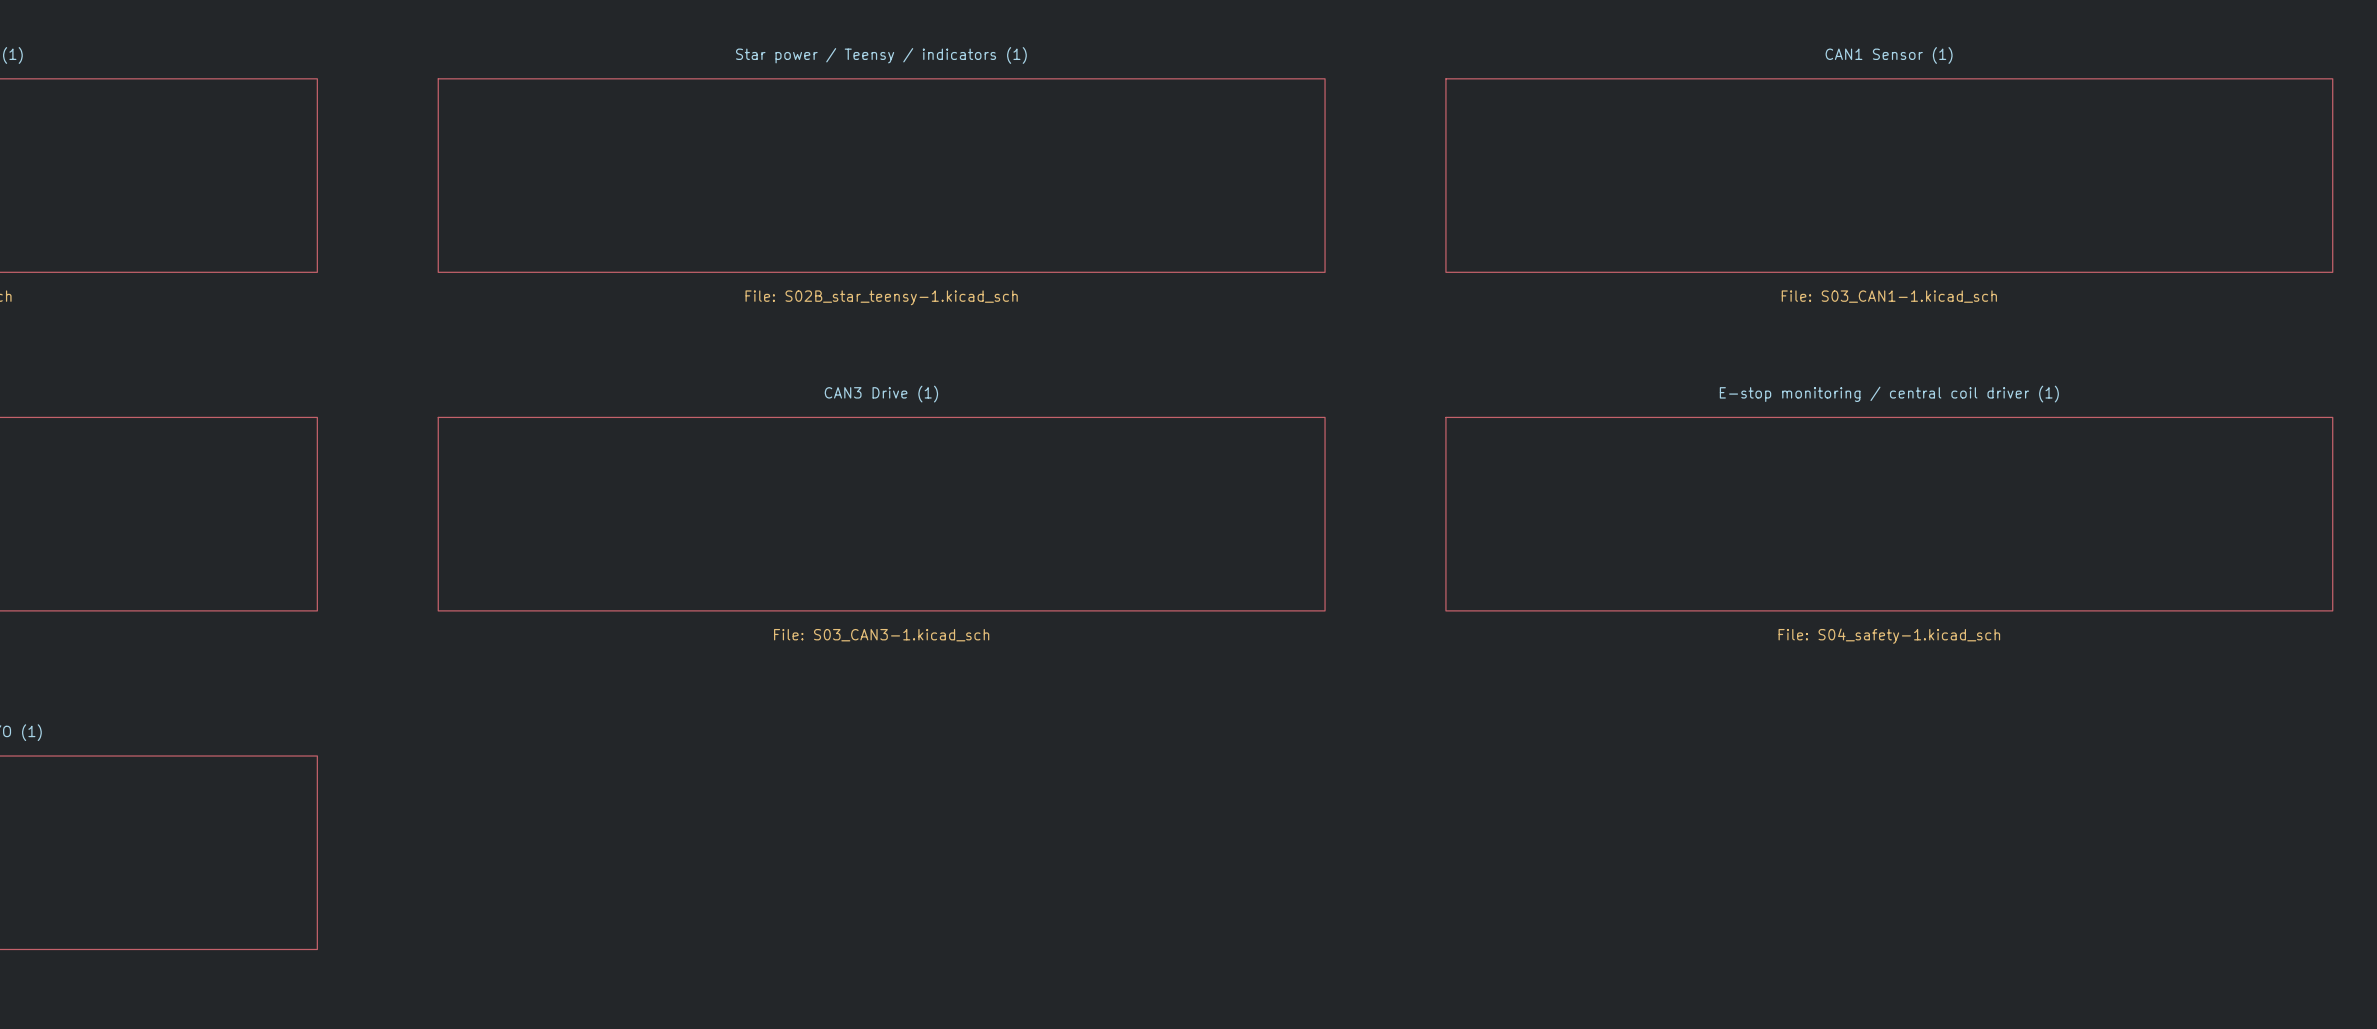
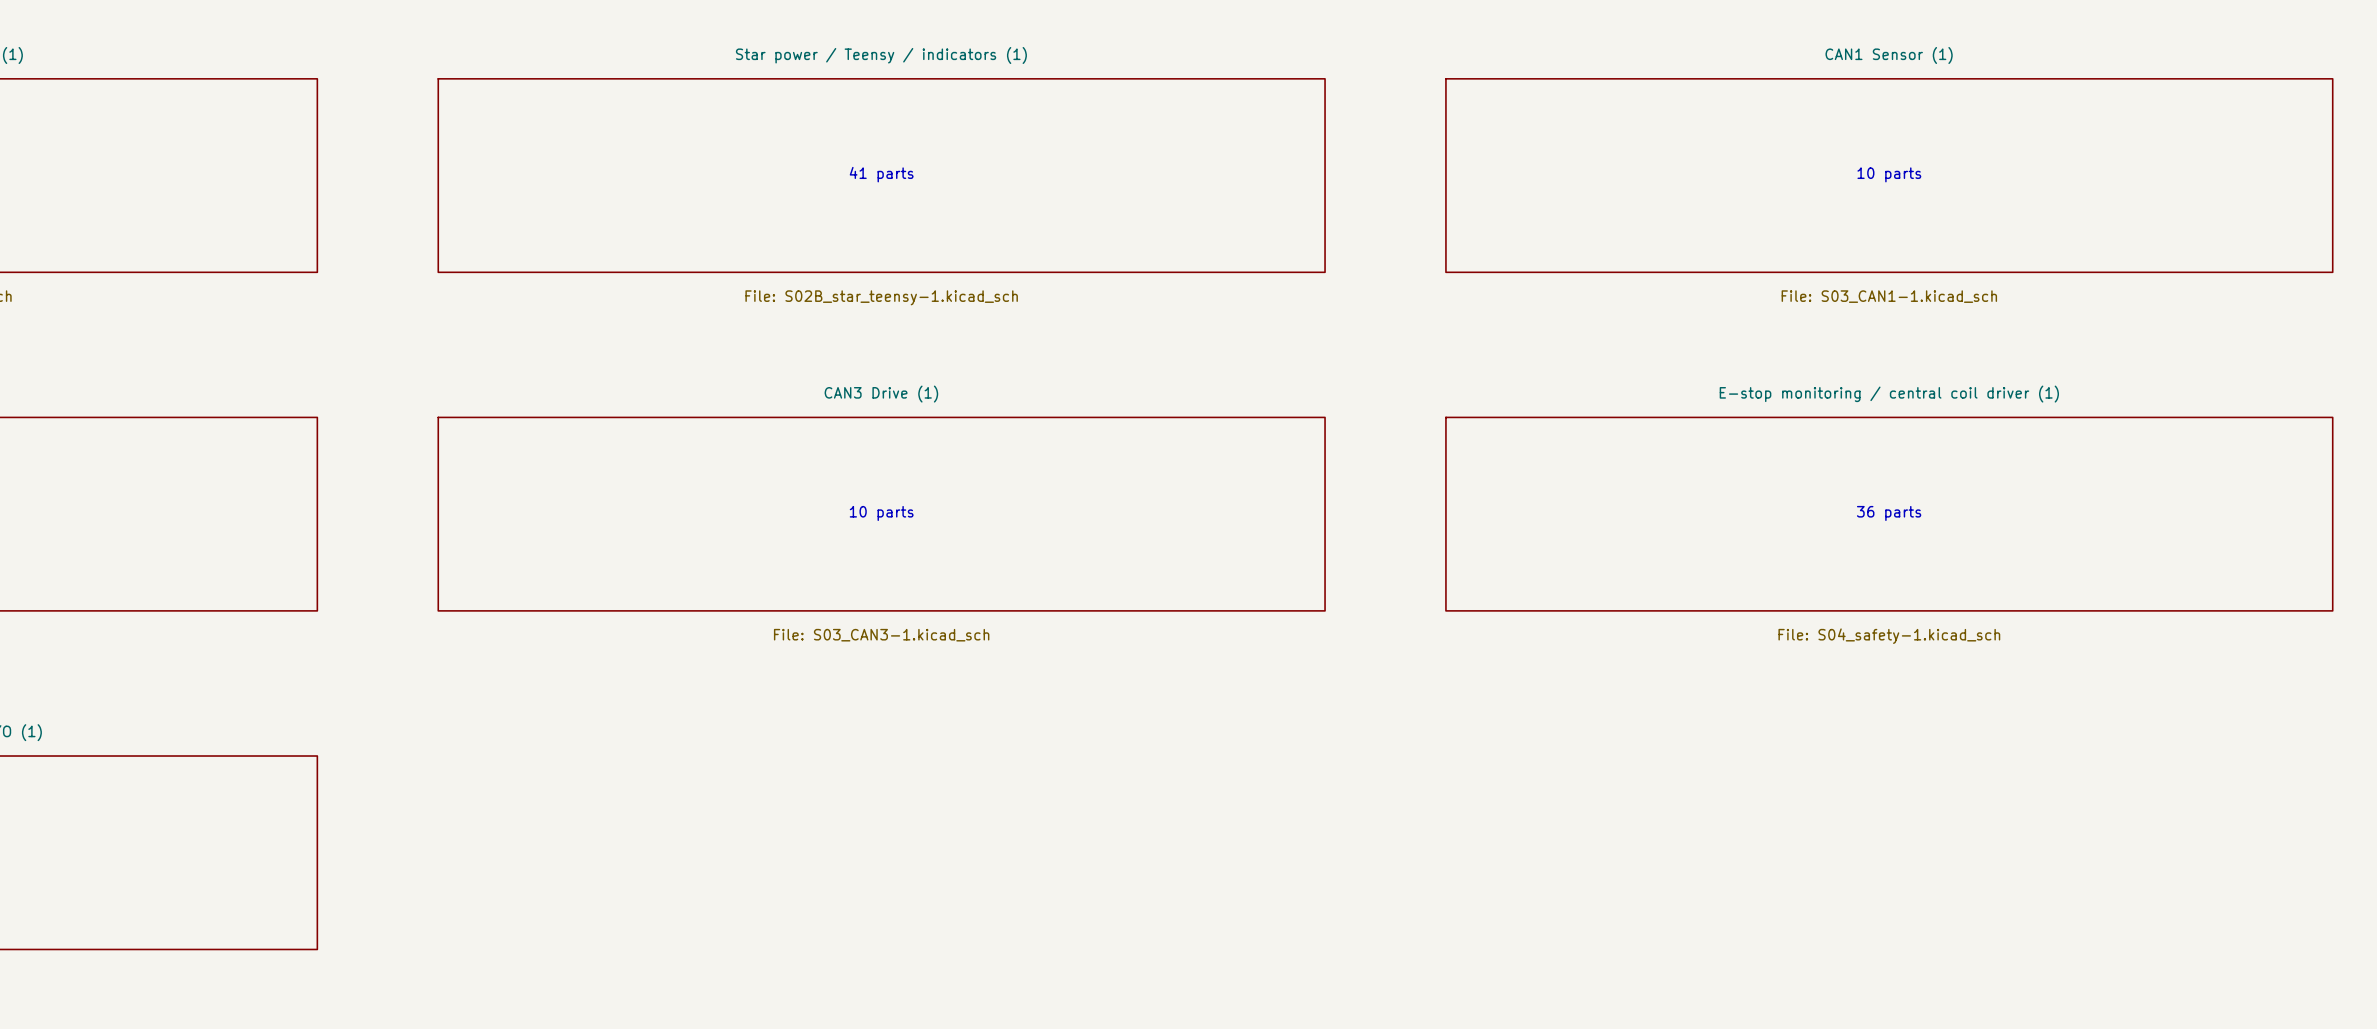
text: none -> 41 parts (881, 174)
text: none -> 10 parts (1889, 174)
text: none -> 10 parts (881, 513)
text: none -> 36 parts (1889, 513)

